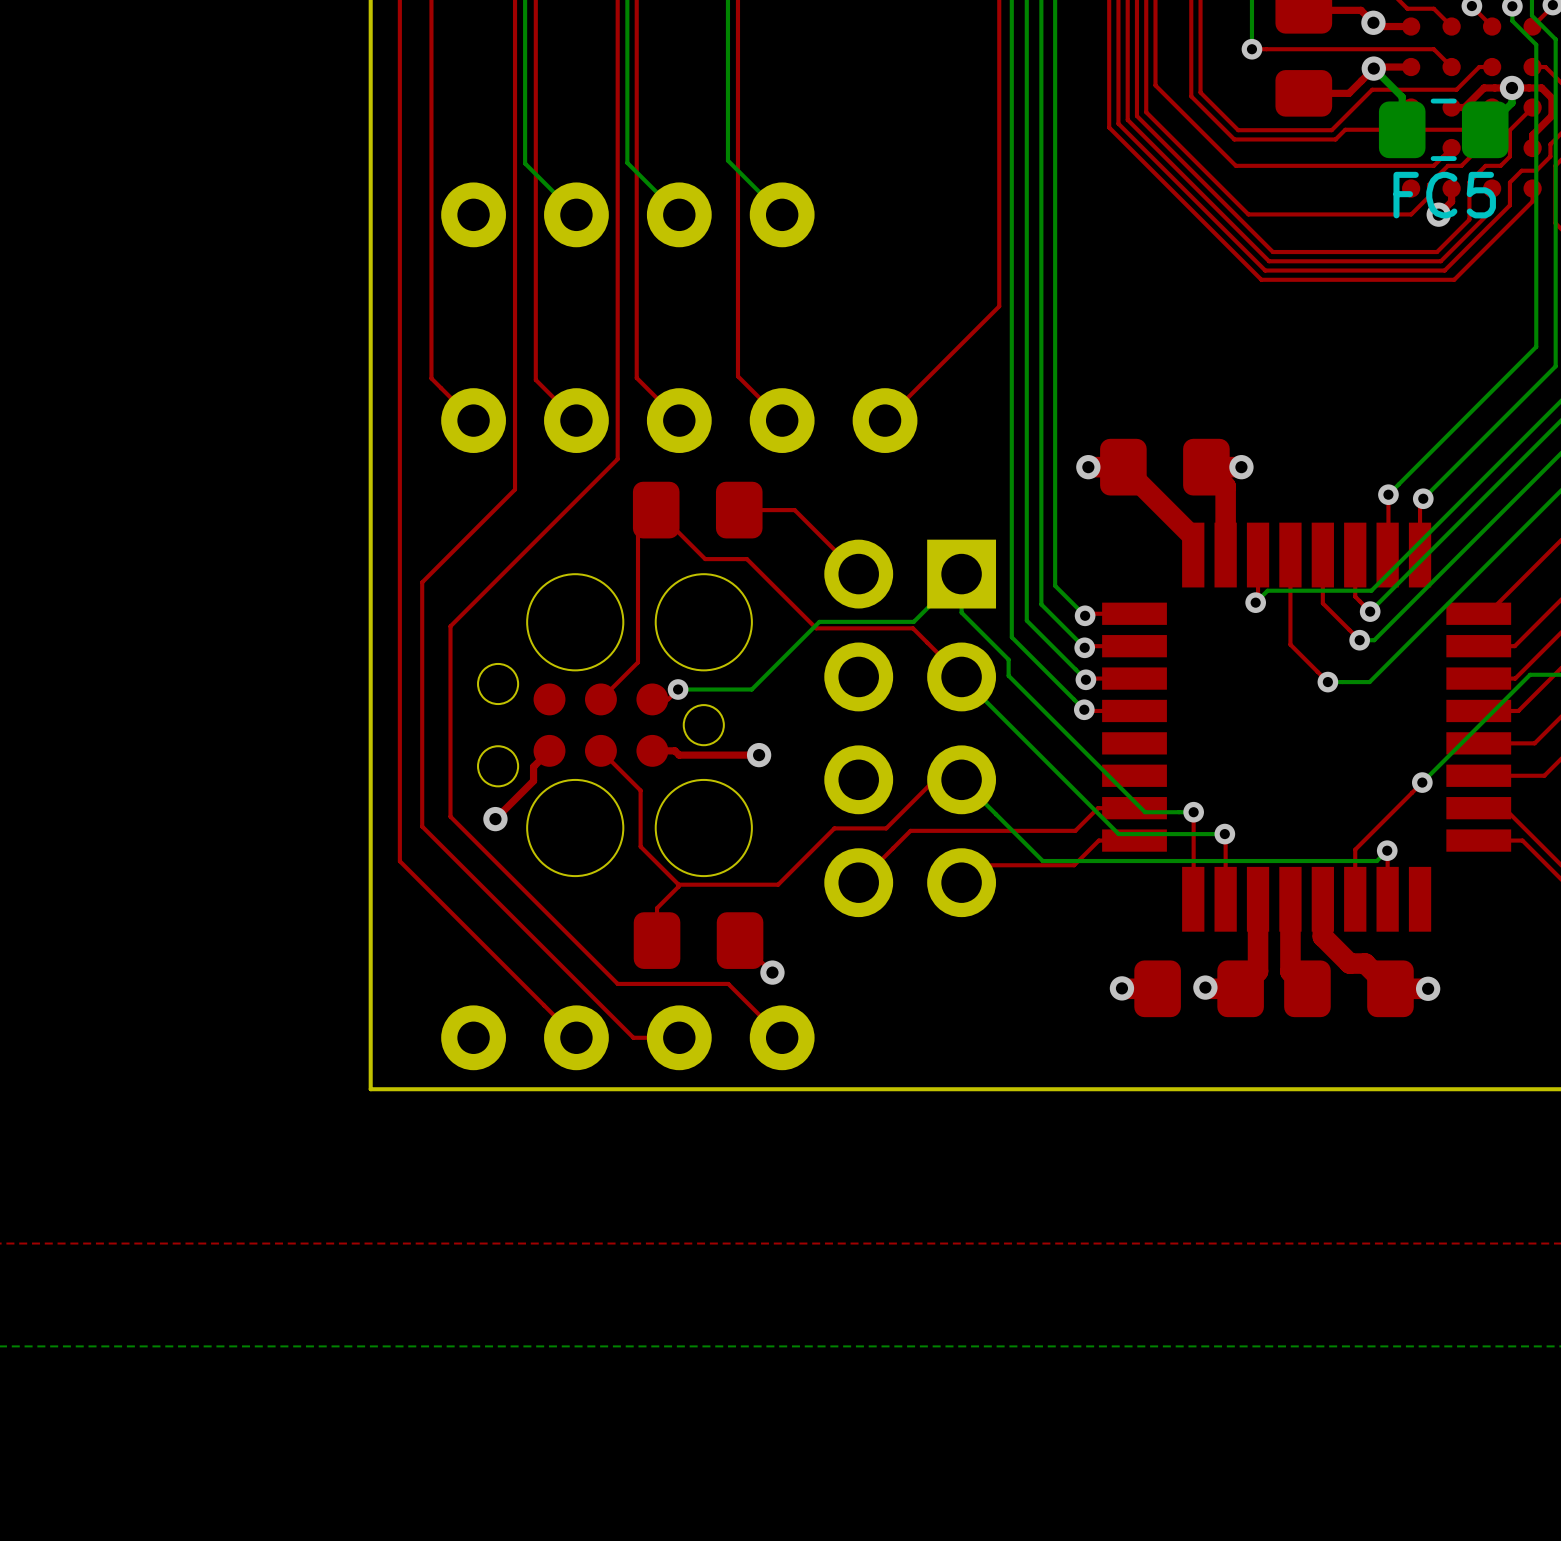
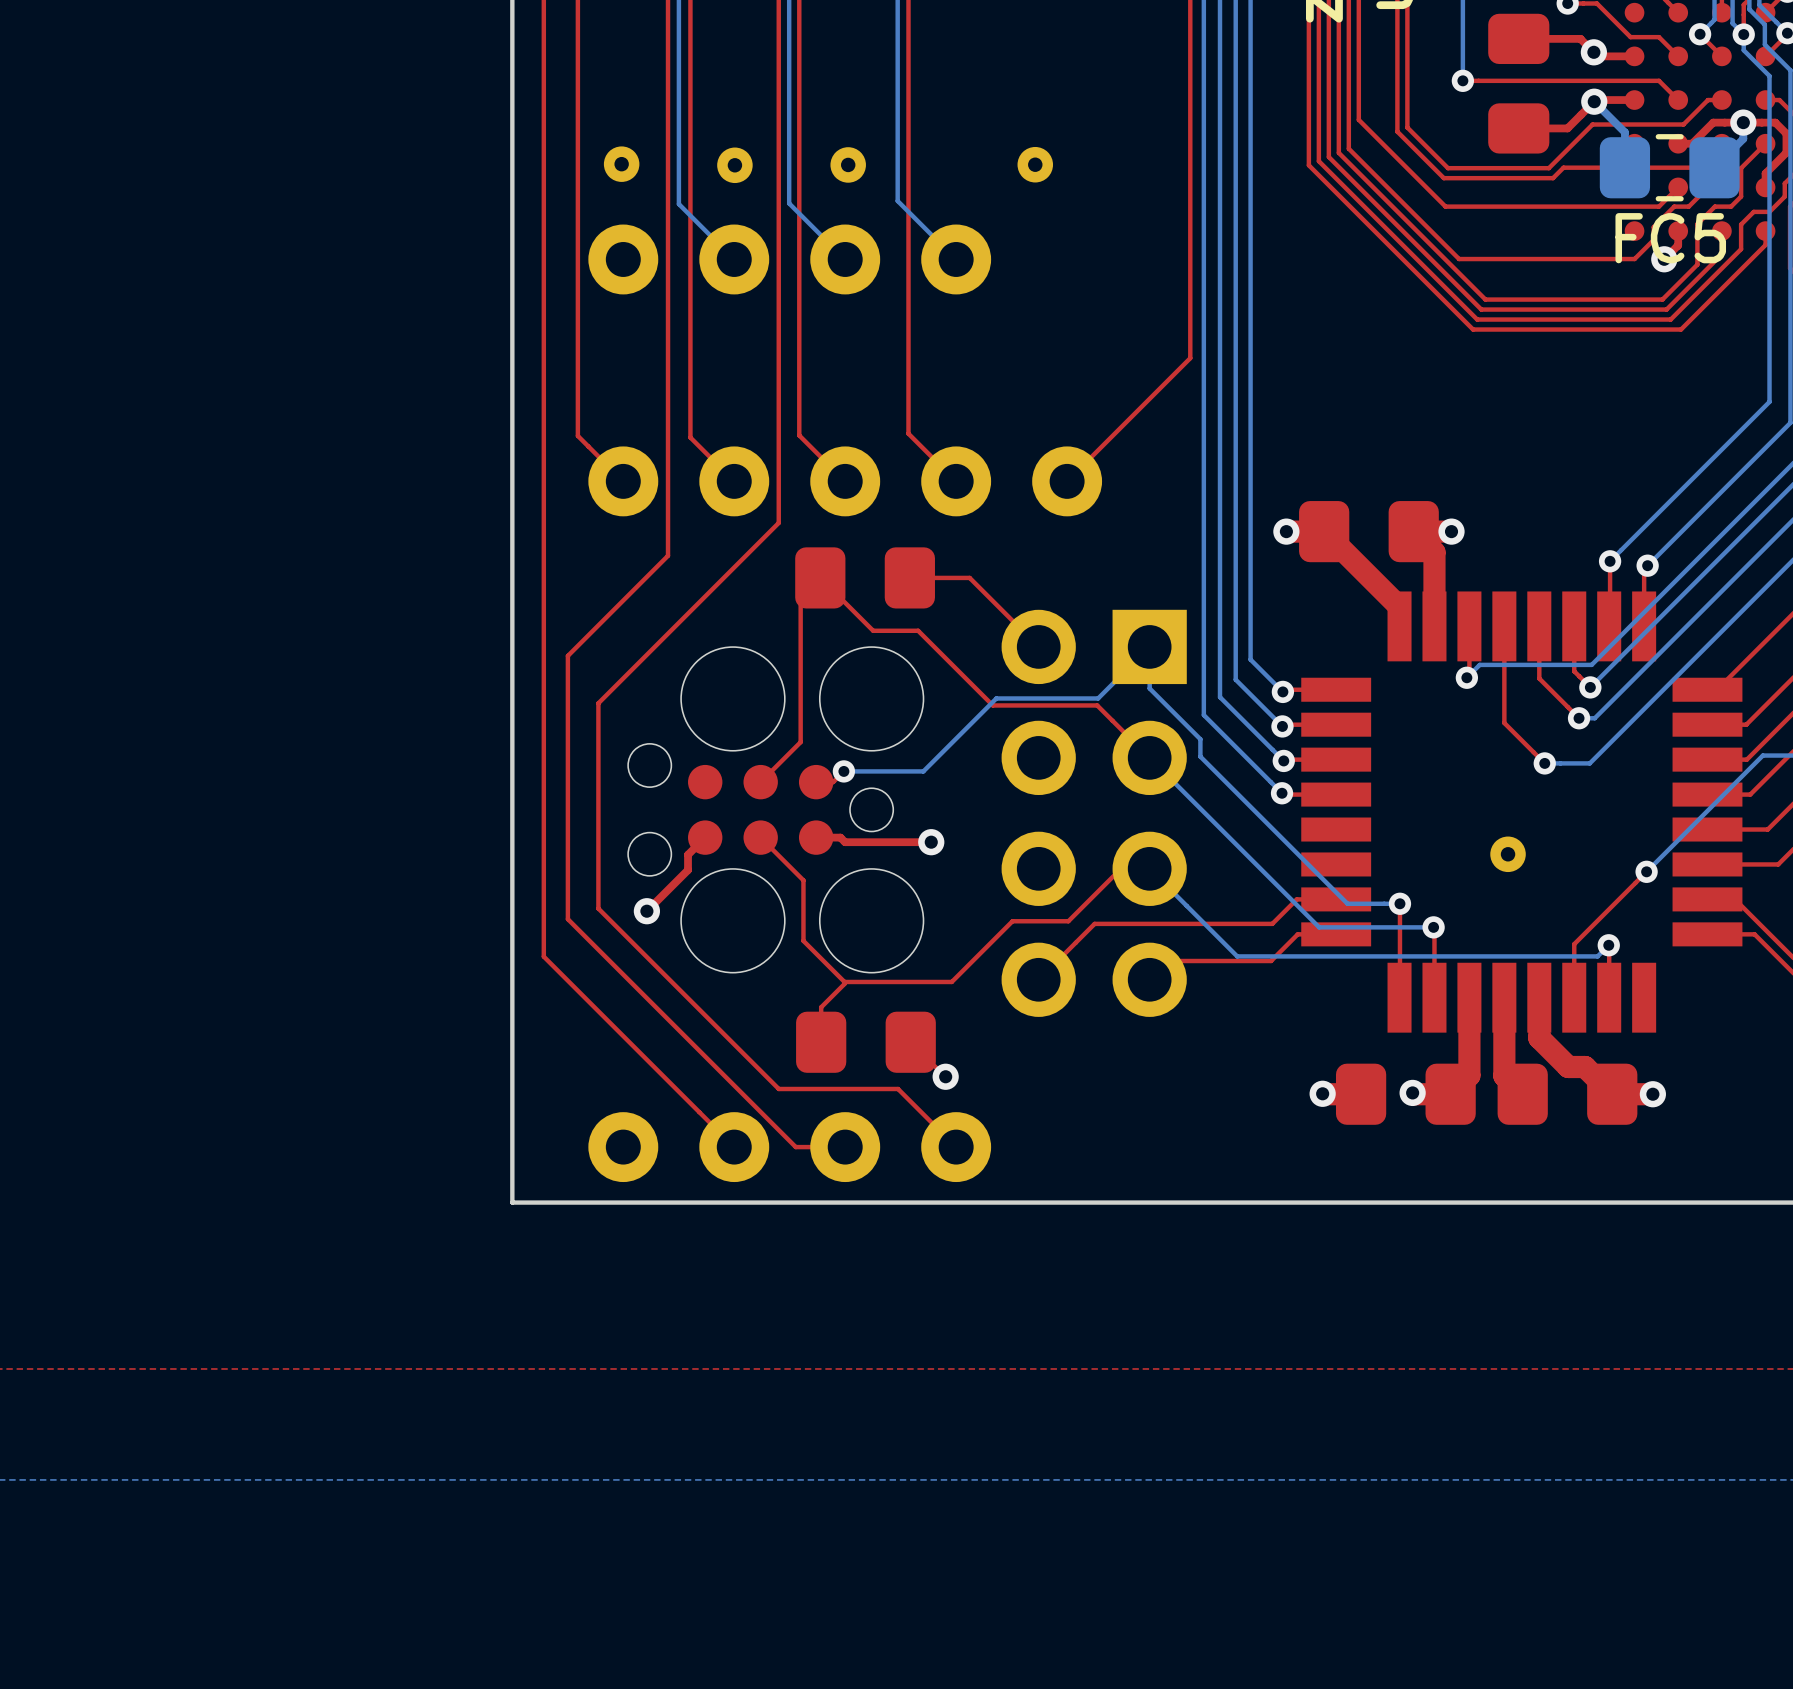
part: none -> (621, 164)
part: none -> (734, 165)
part: none -> (848, 164)
part: none -> (1035, 164)
part: none -> (1508, 854)

